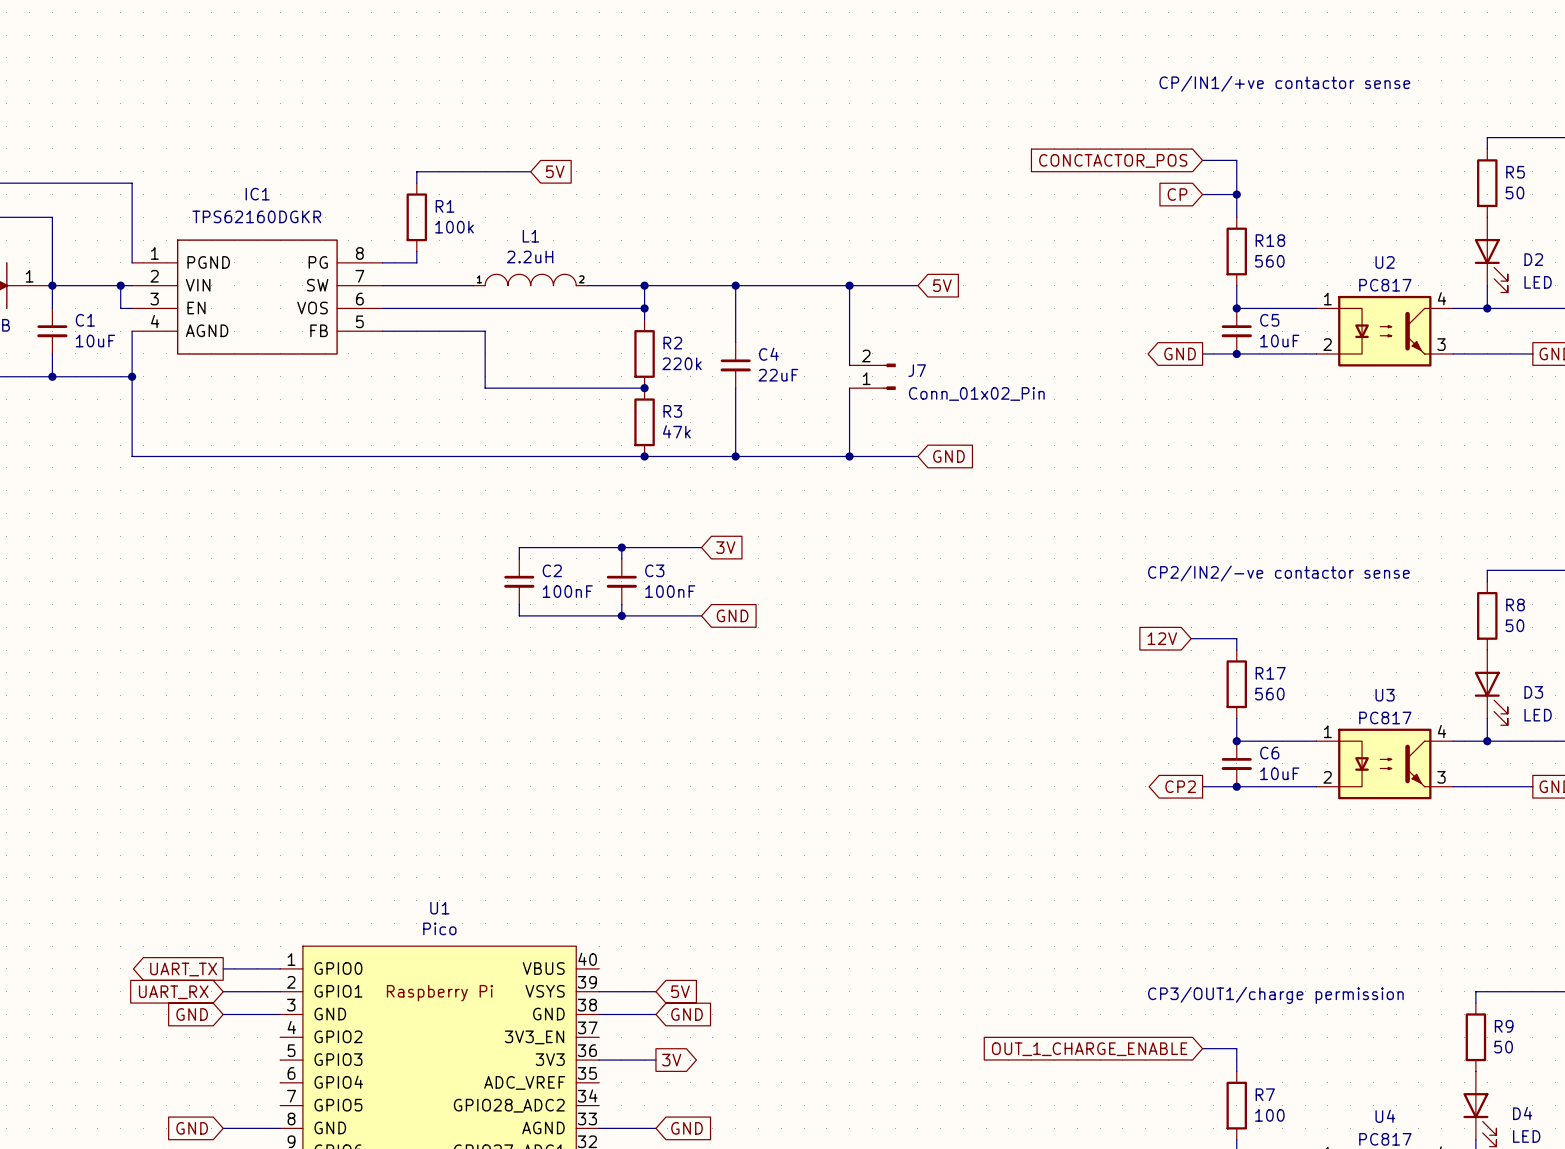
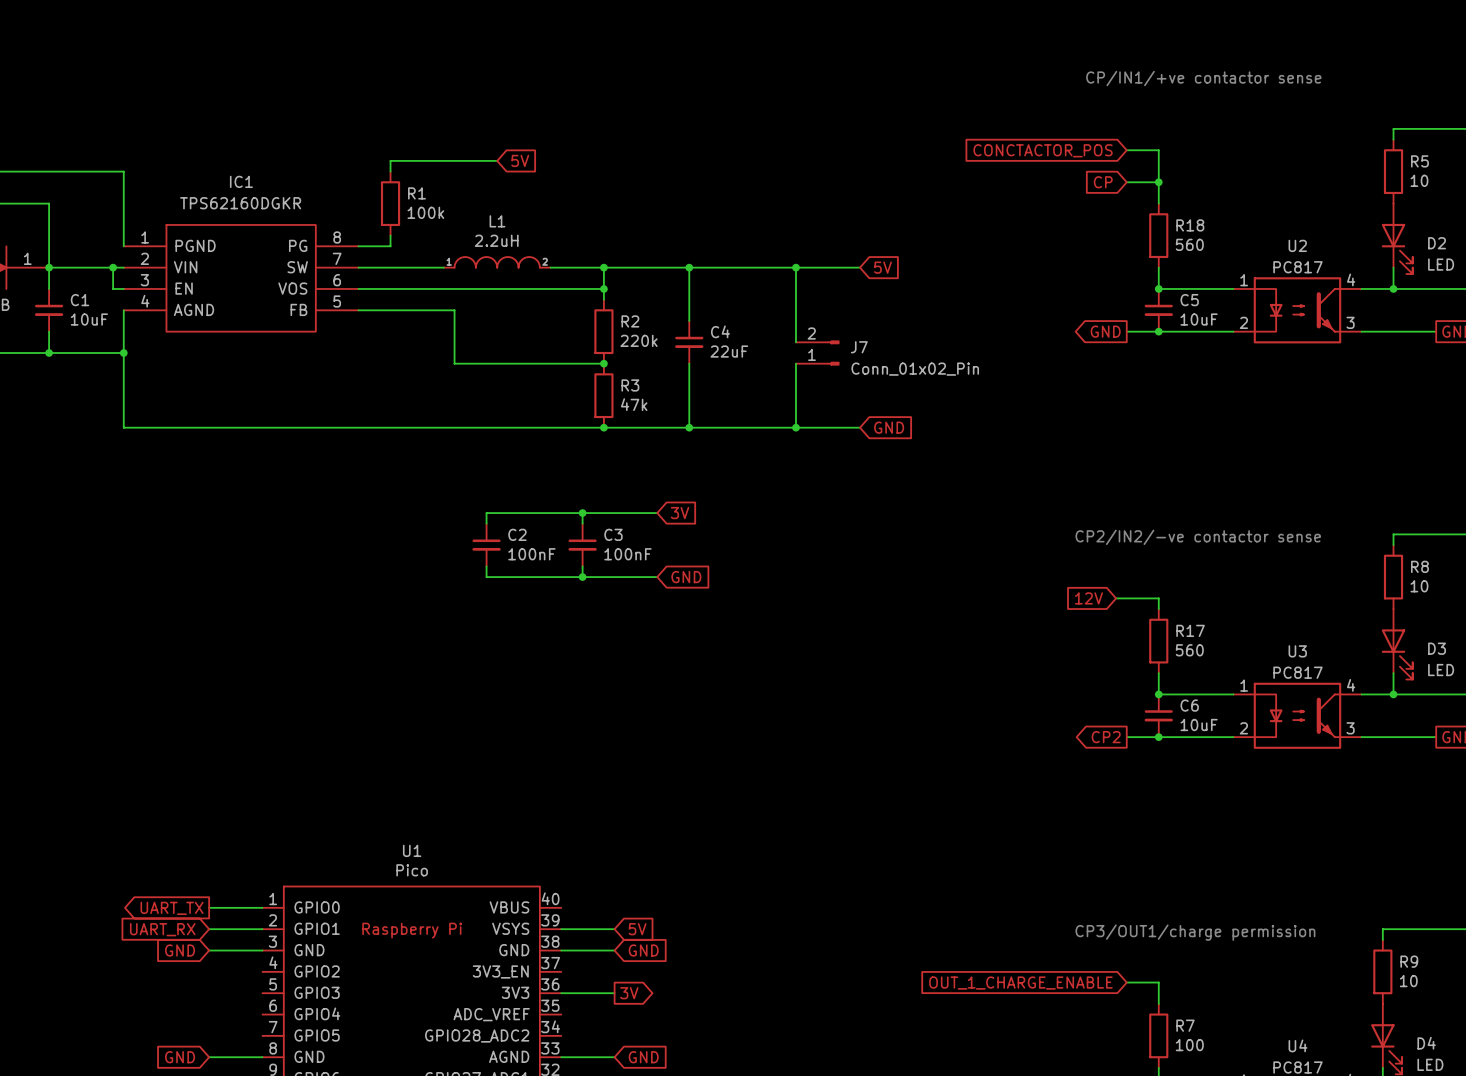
R5 value: 50 (1514, 192) -> 10 (1419, 180)
R8 value: 50 (1514, 625) -> 10 (1419, 586)
R9 value: 50 (1503, 1047) -> 10 (1408, 981)

